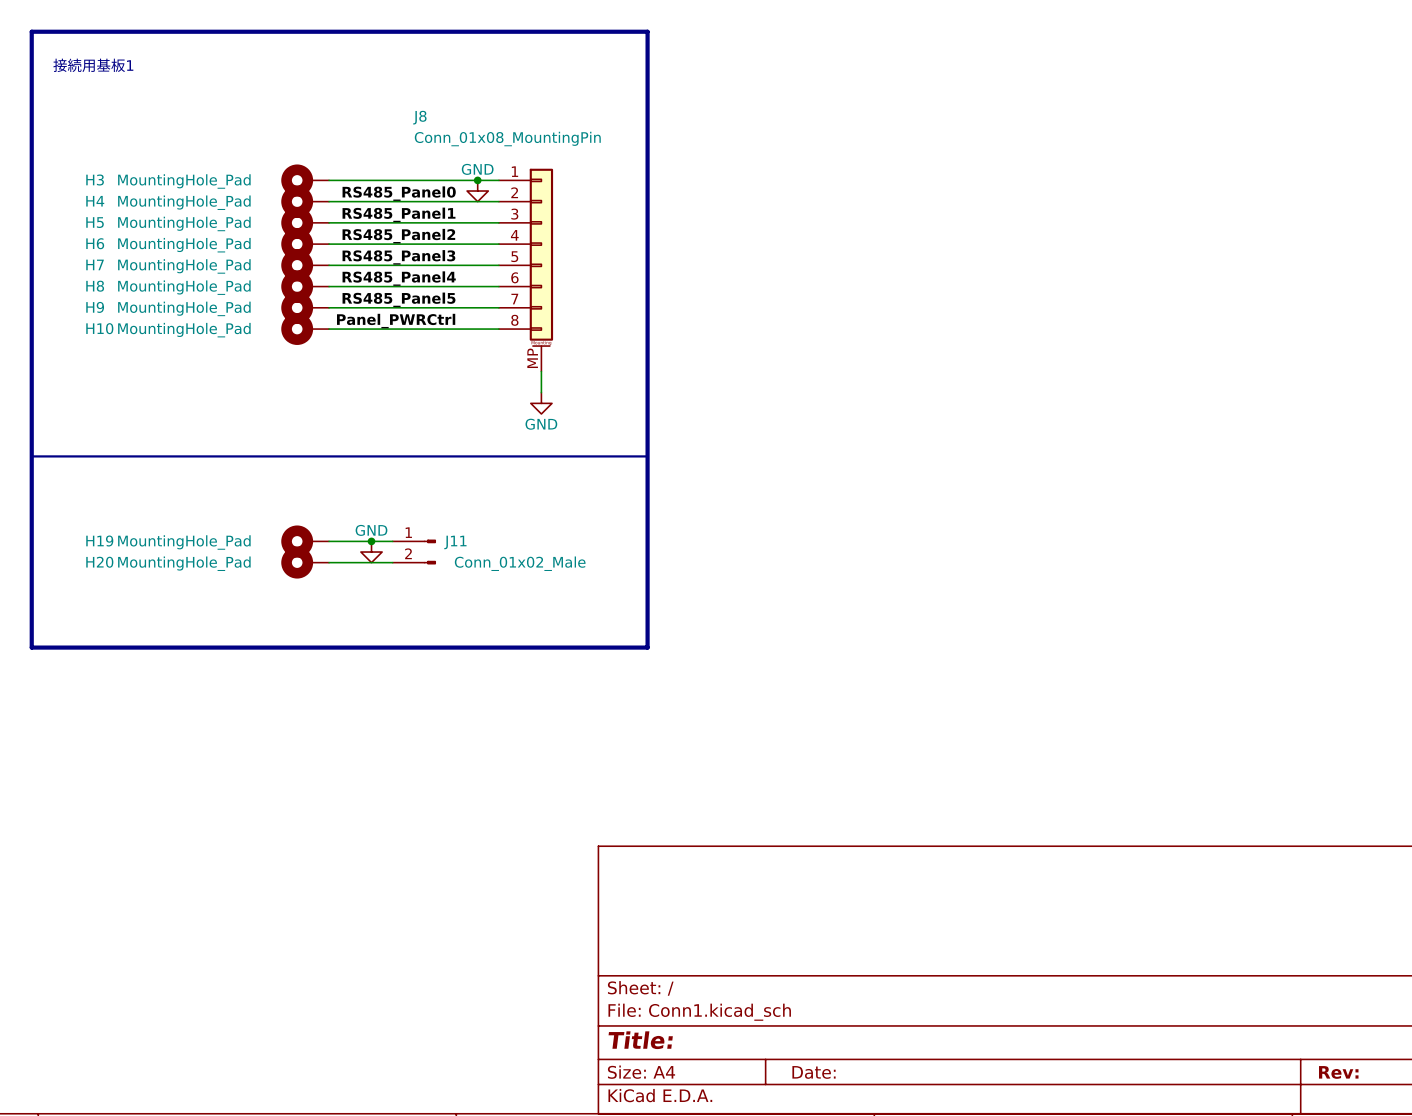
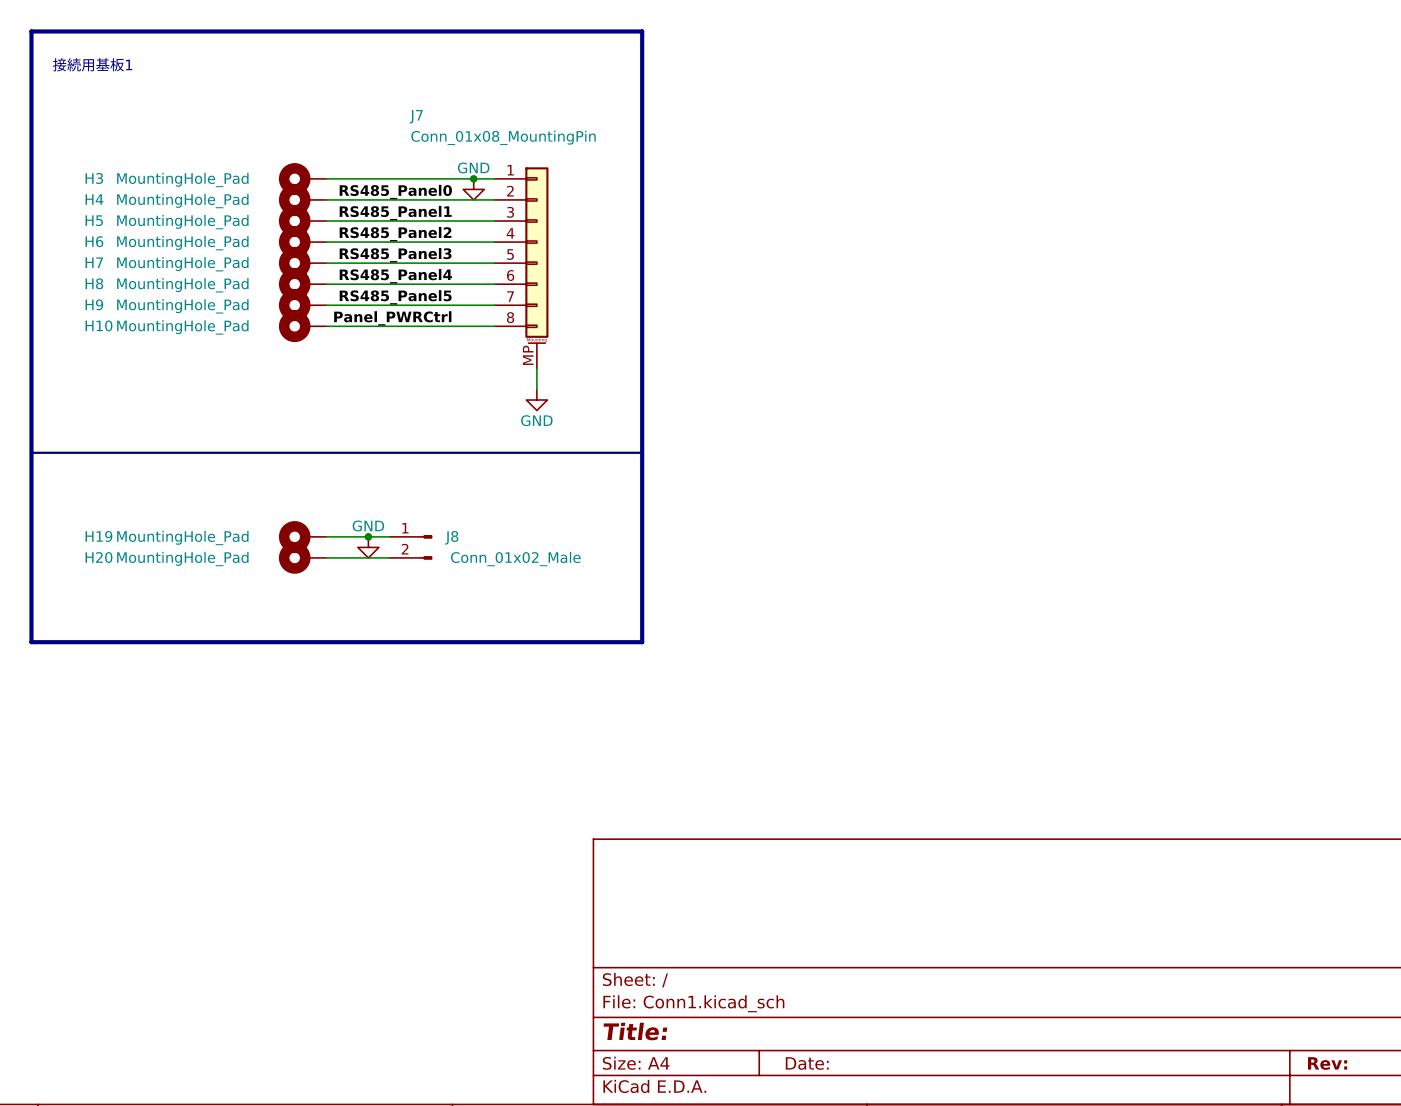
J8 name: J8 (419, 117) -> J7 (416, 116)
J11 name: J11 (455, 542) -> J8 (451, 537)

